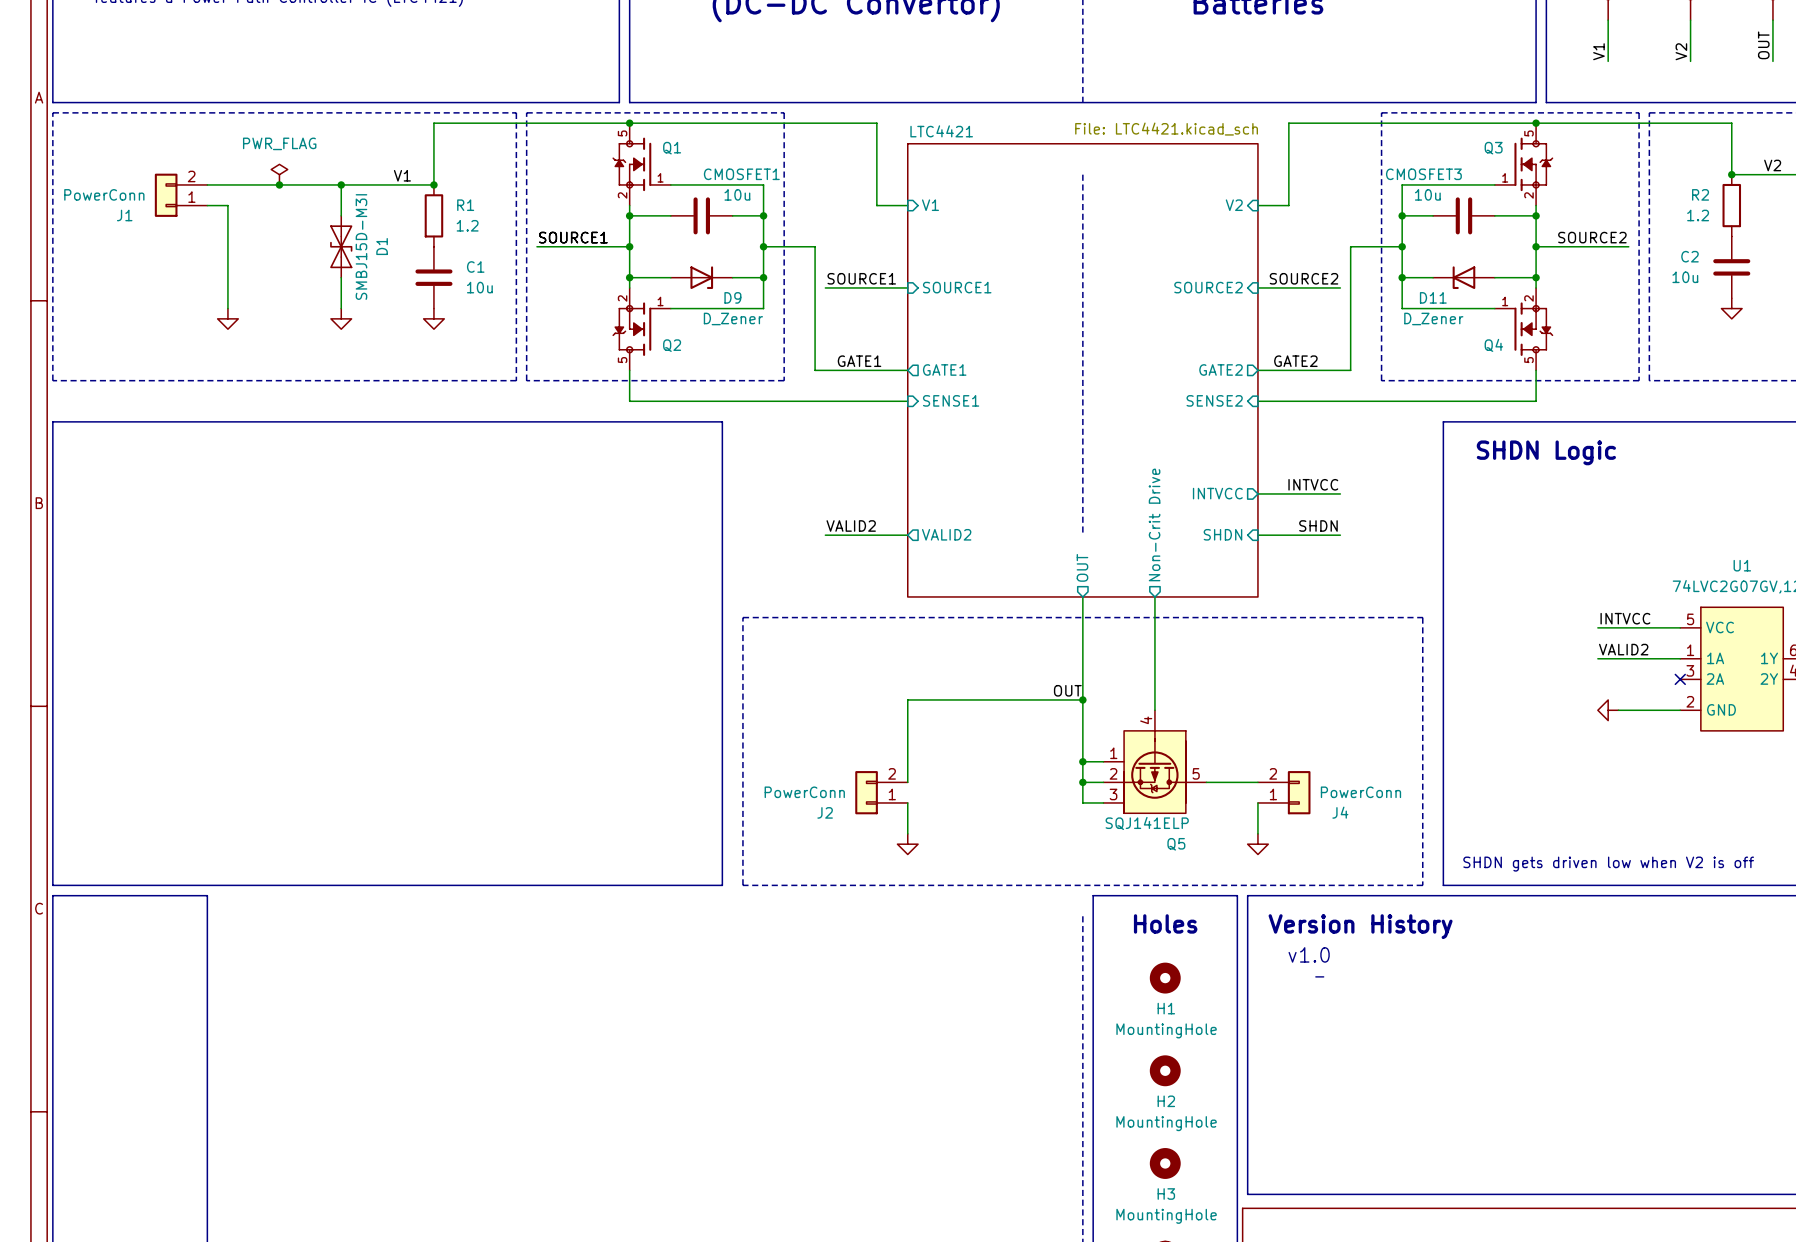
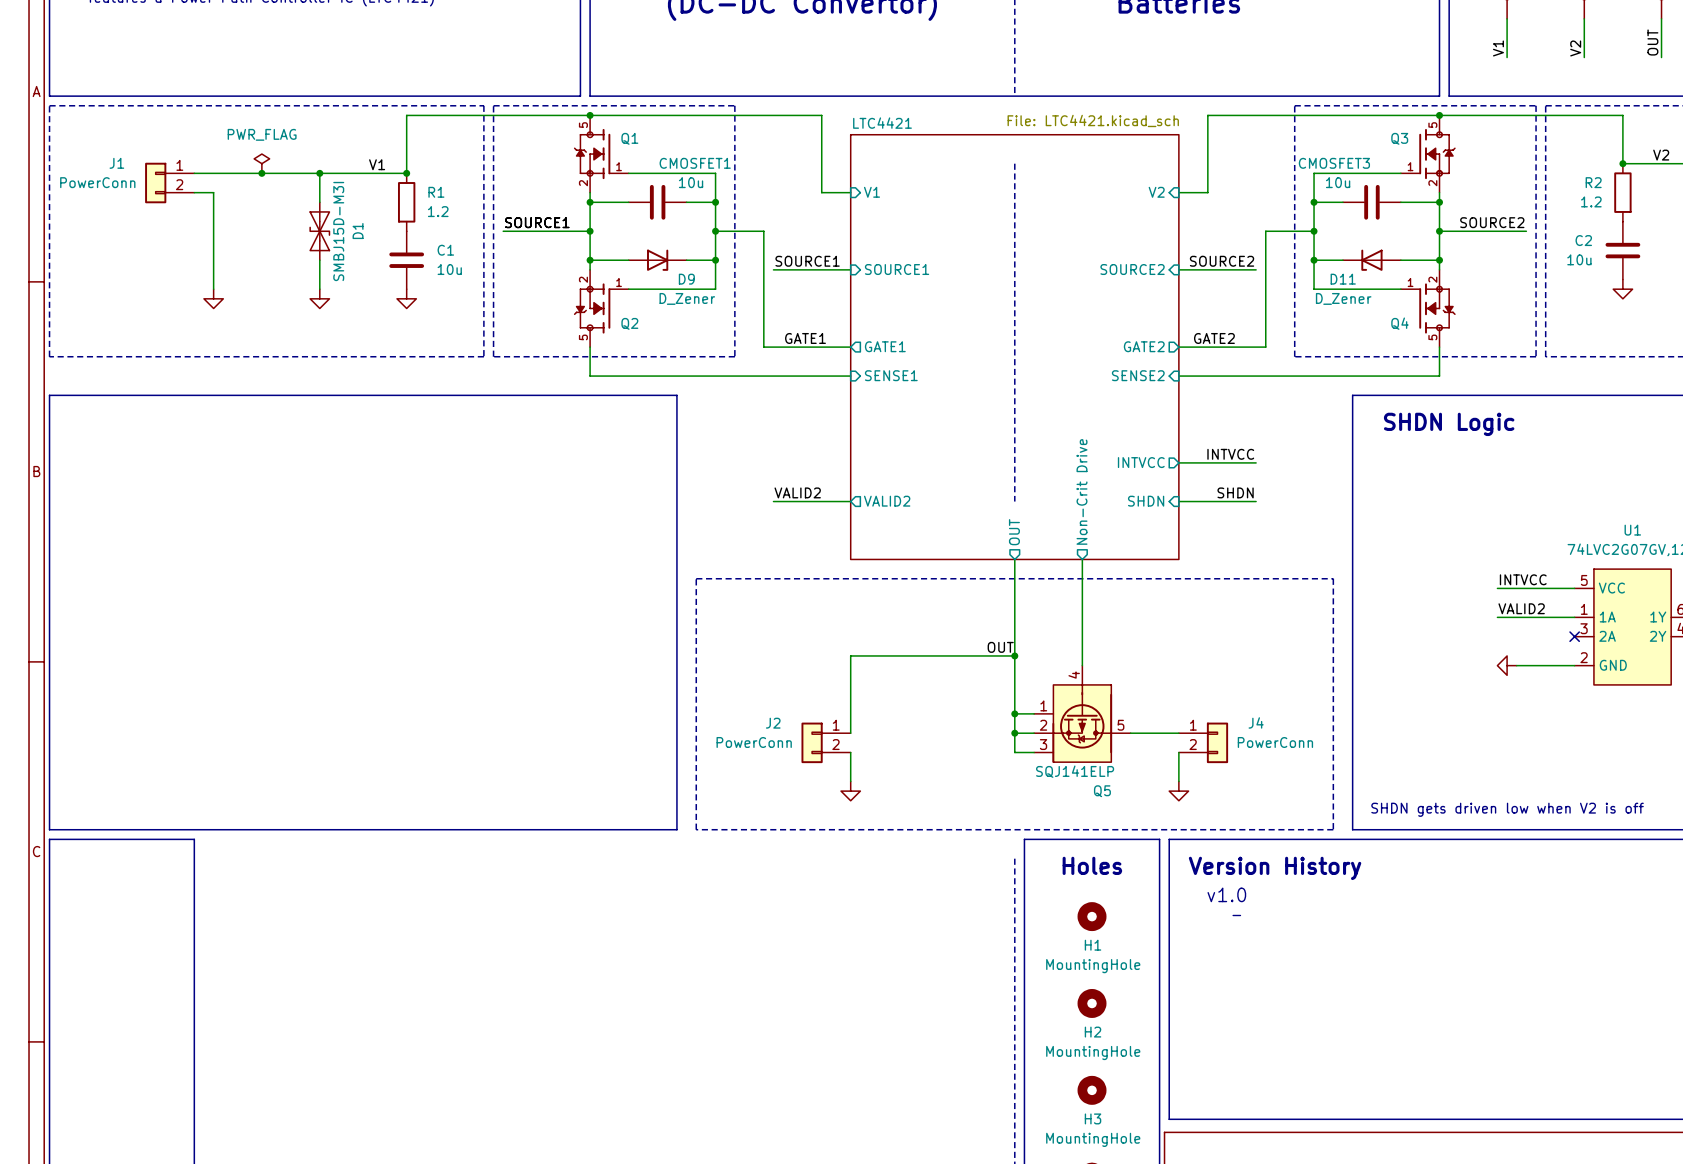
J1 flip: as is (166, 195) -> up-down (155, 183)
J2 flip: as is (866, 792) -> up-down (812, 742)
J4 flip: as is (1299, 792) -> up-down (1217, 742)

